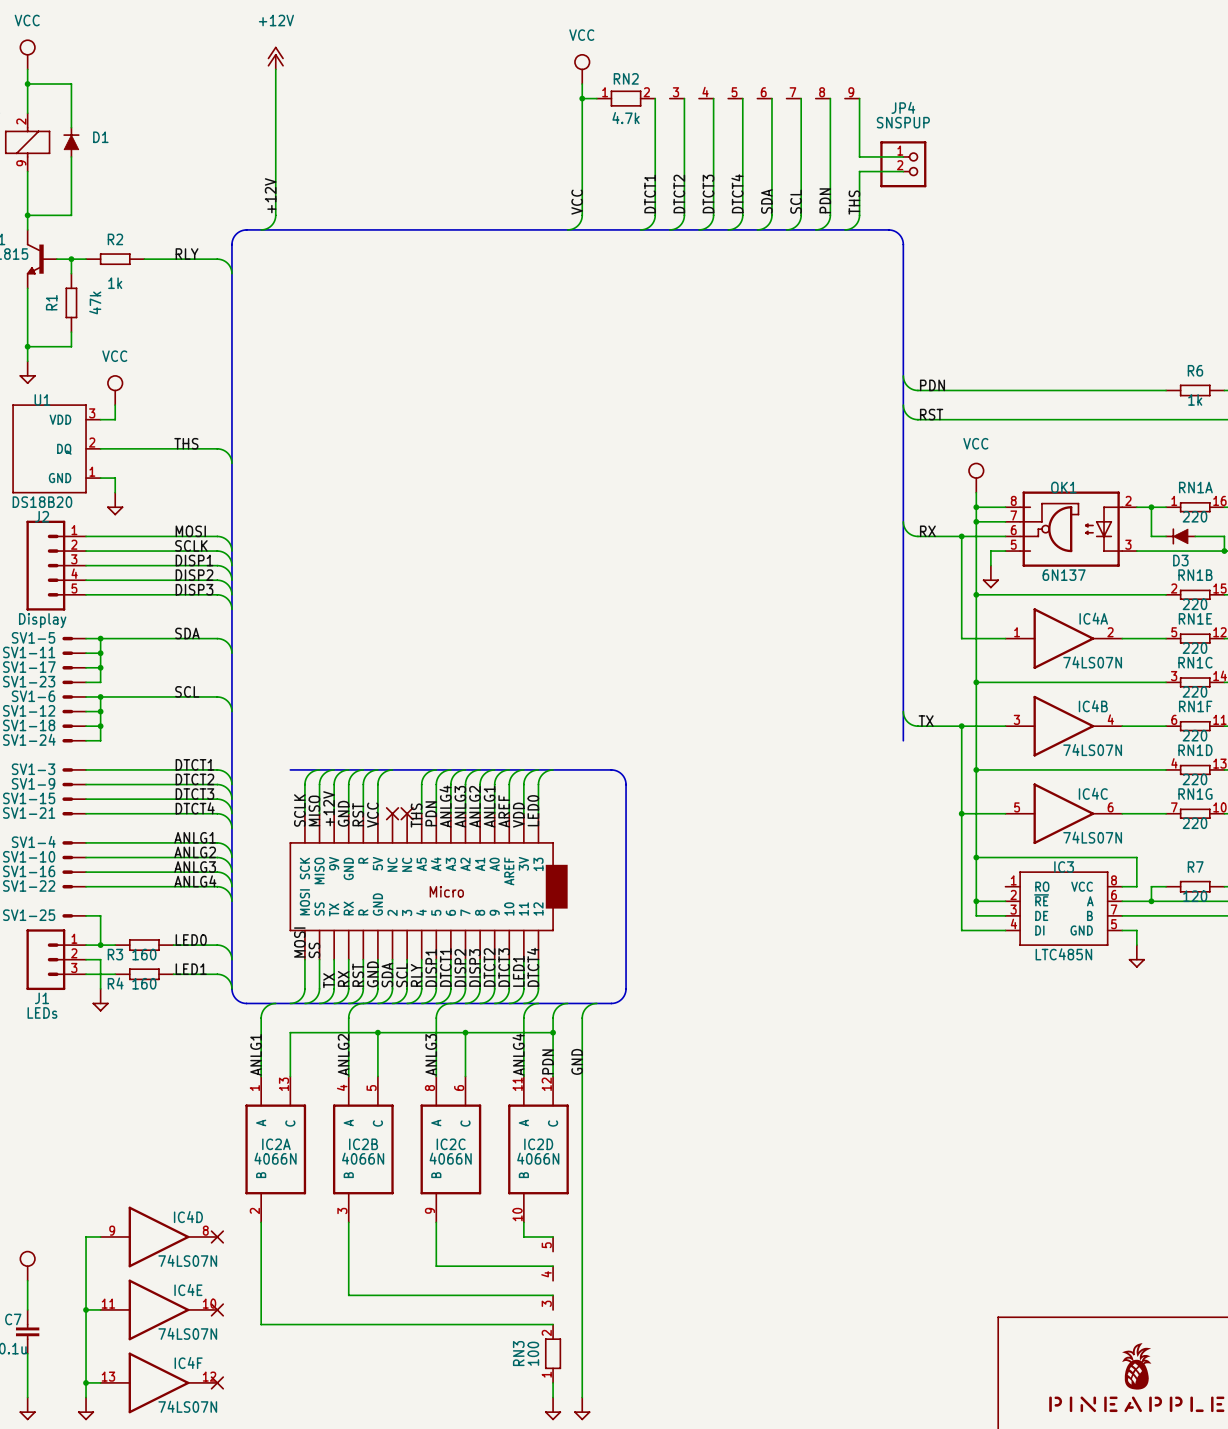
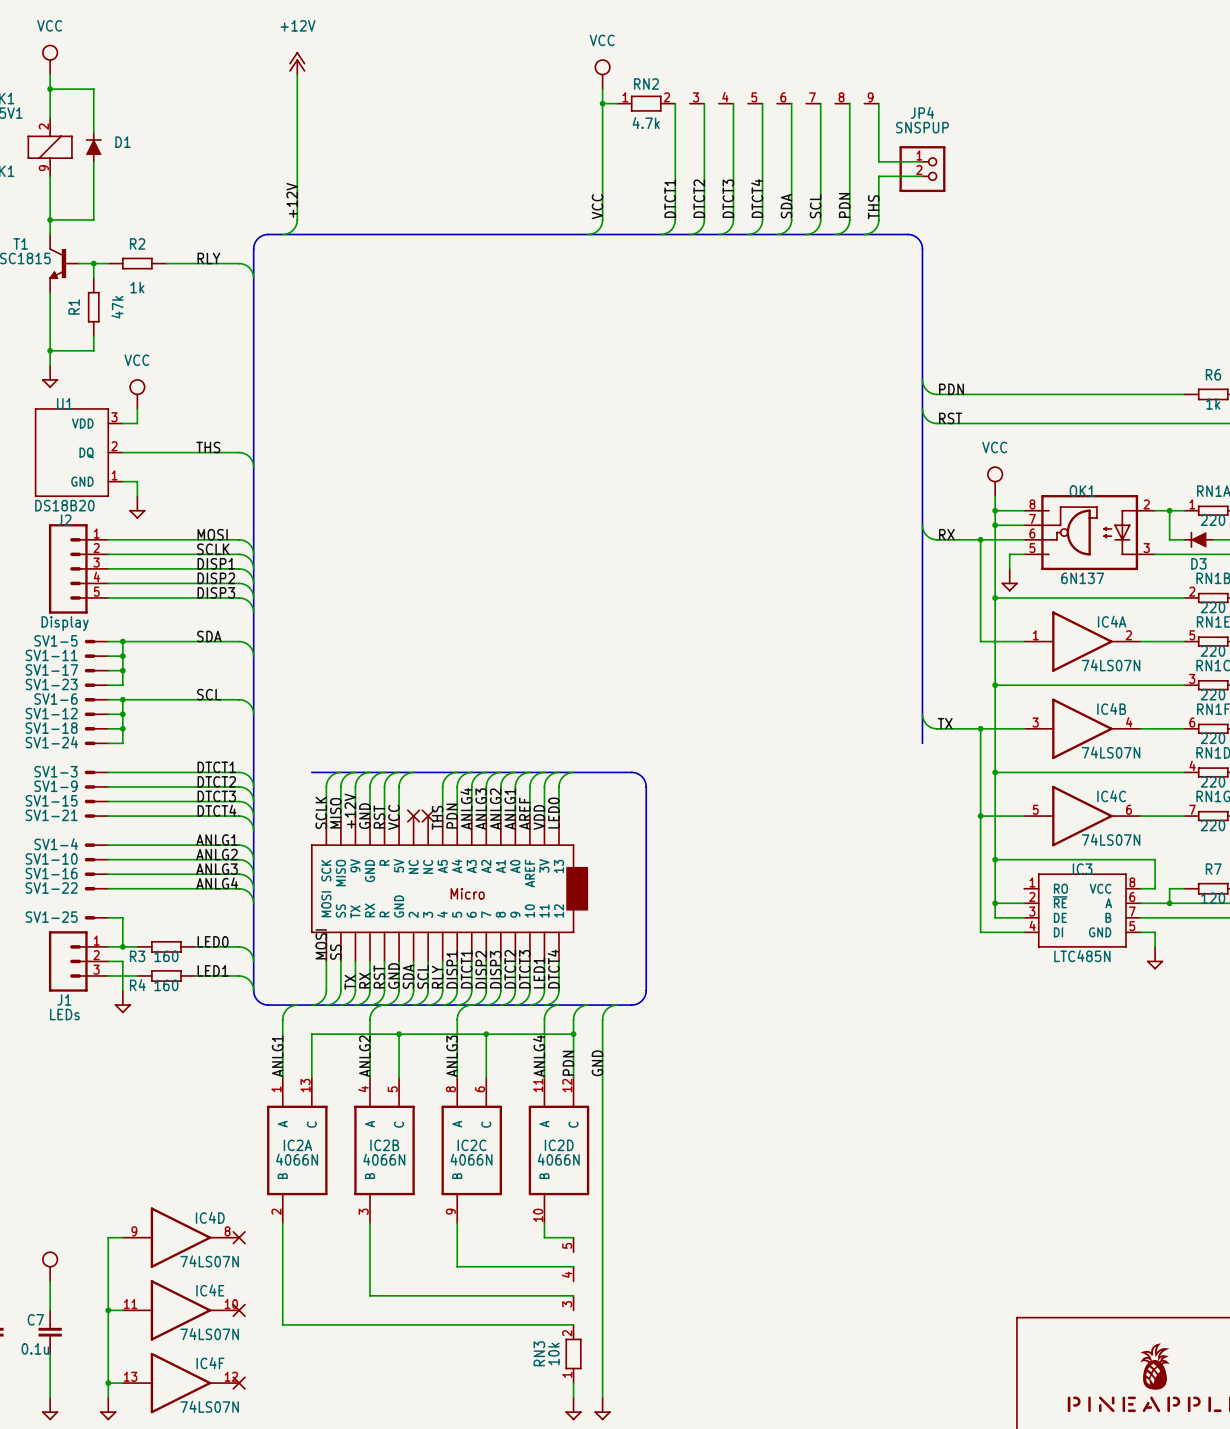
RN3 value: 100 (533, 1353) -> 10k (553, 1353)

